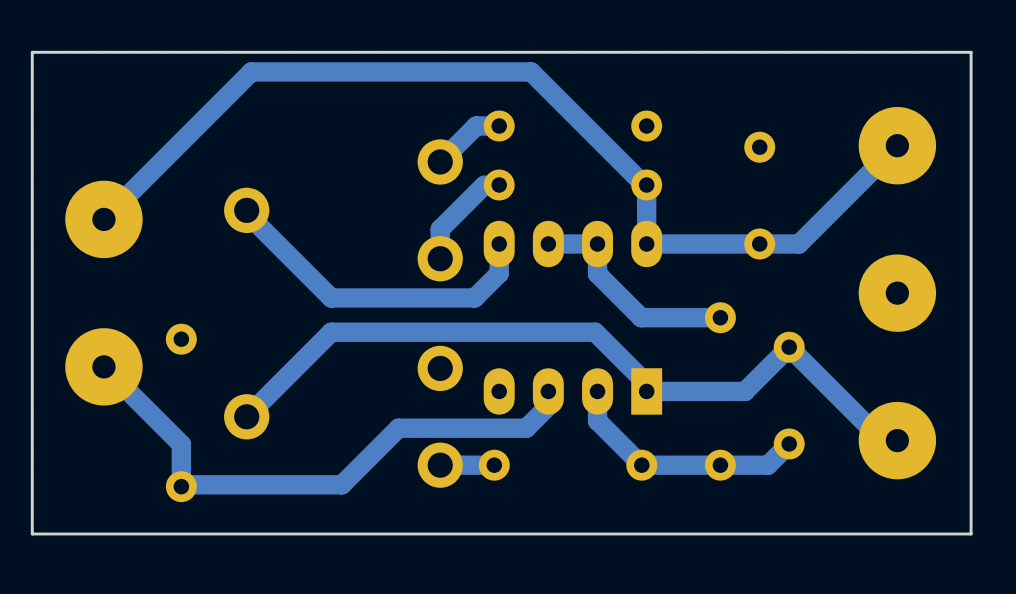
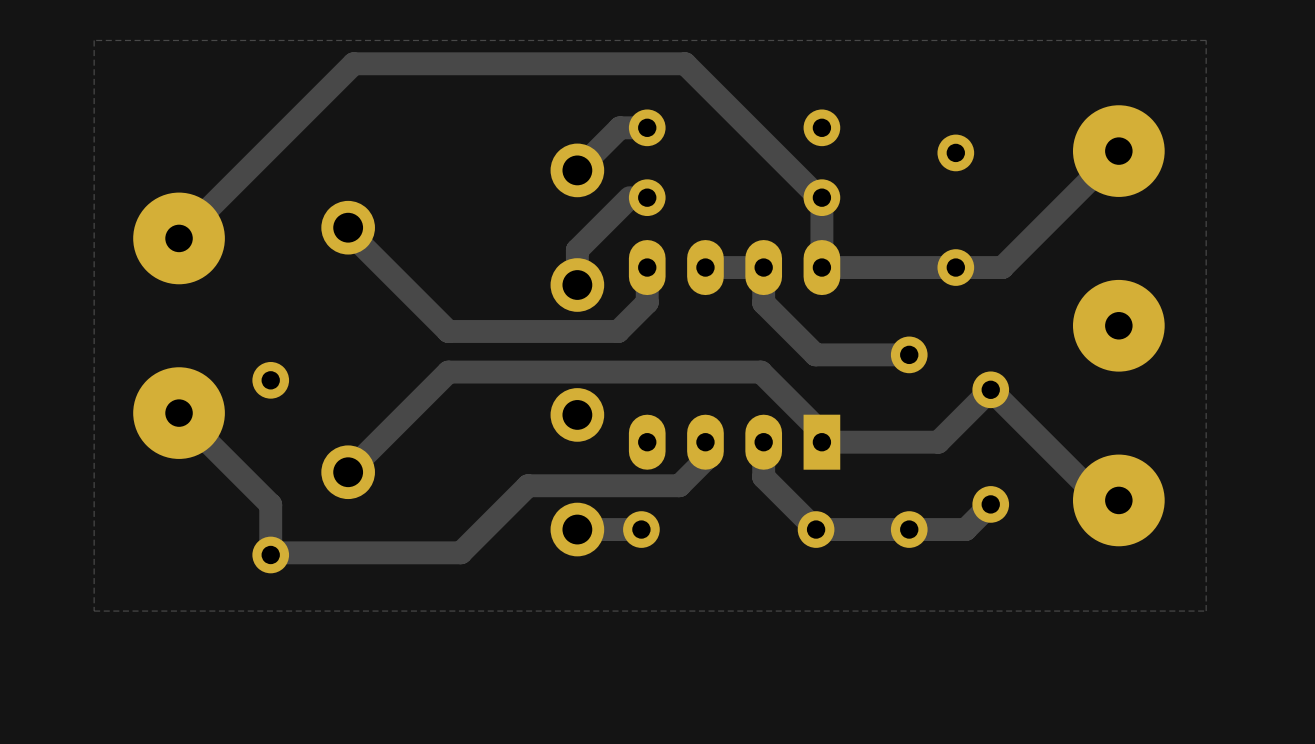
board edge: (971, 52) (32, 52) (32, 533) (971, 533) (971, 52) -> none

